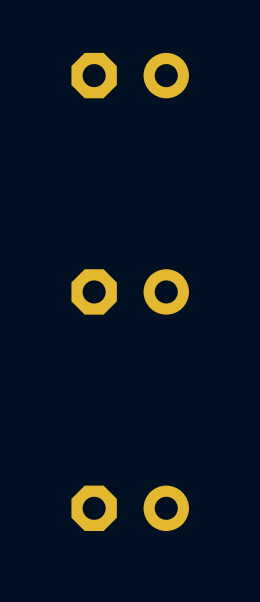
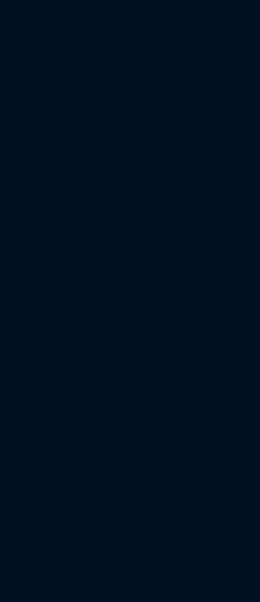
part: (130, 75) -> none
part: (130, 291) -> none
part: (130, 508) -> none

